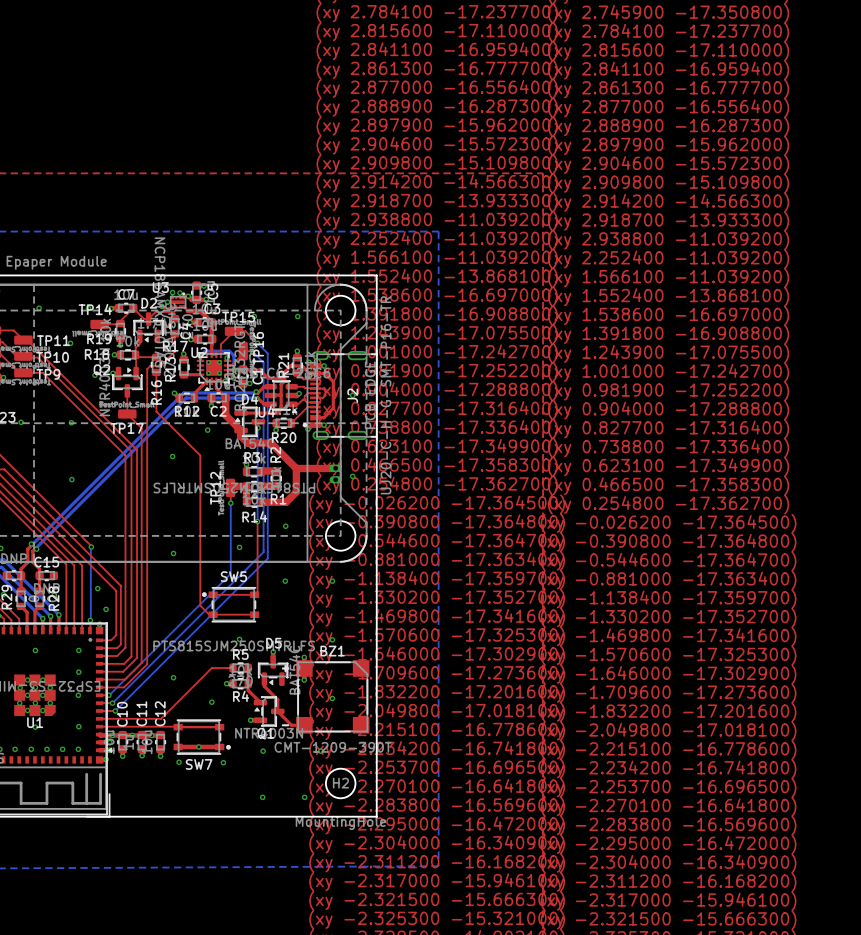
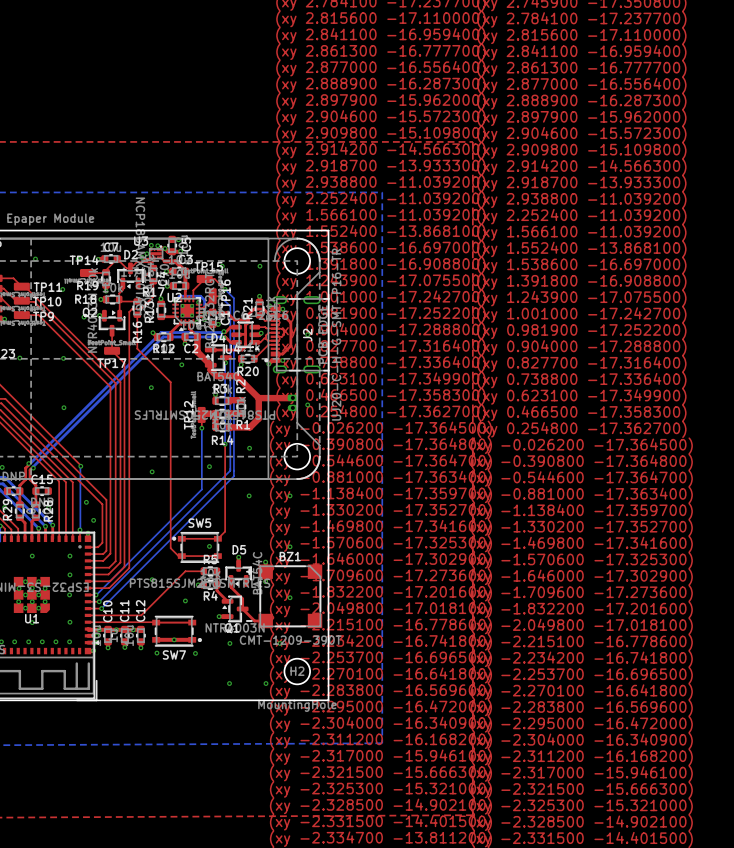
top track: (194, 450) (200, 455) (200, 605) (209, 614) (254, 614) -> (170, 382) (170, 548) (178, 556) (217, 556)
top track: (257, 591) (254, 594) (213, 594) -> (225, 505) (225, 531) (217, 538) (181, 538)
SW5 position: (230, 604) -> (197, 547)

